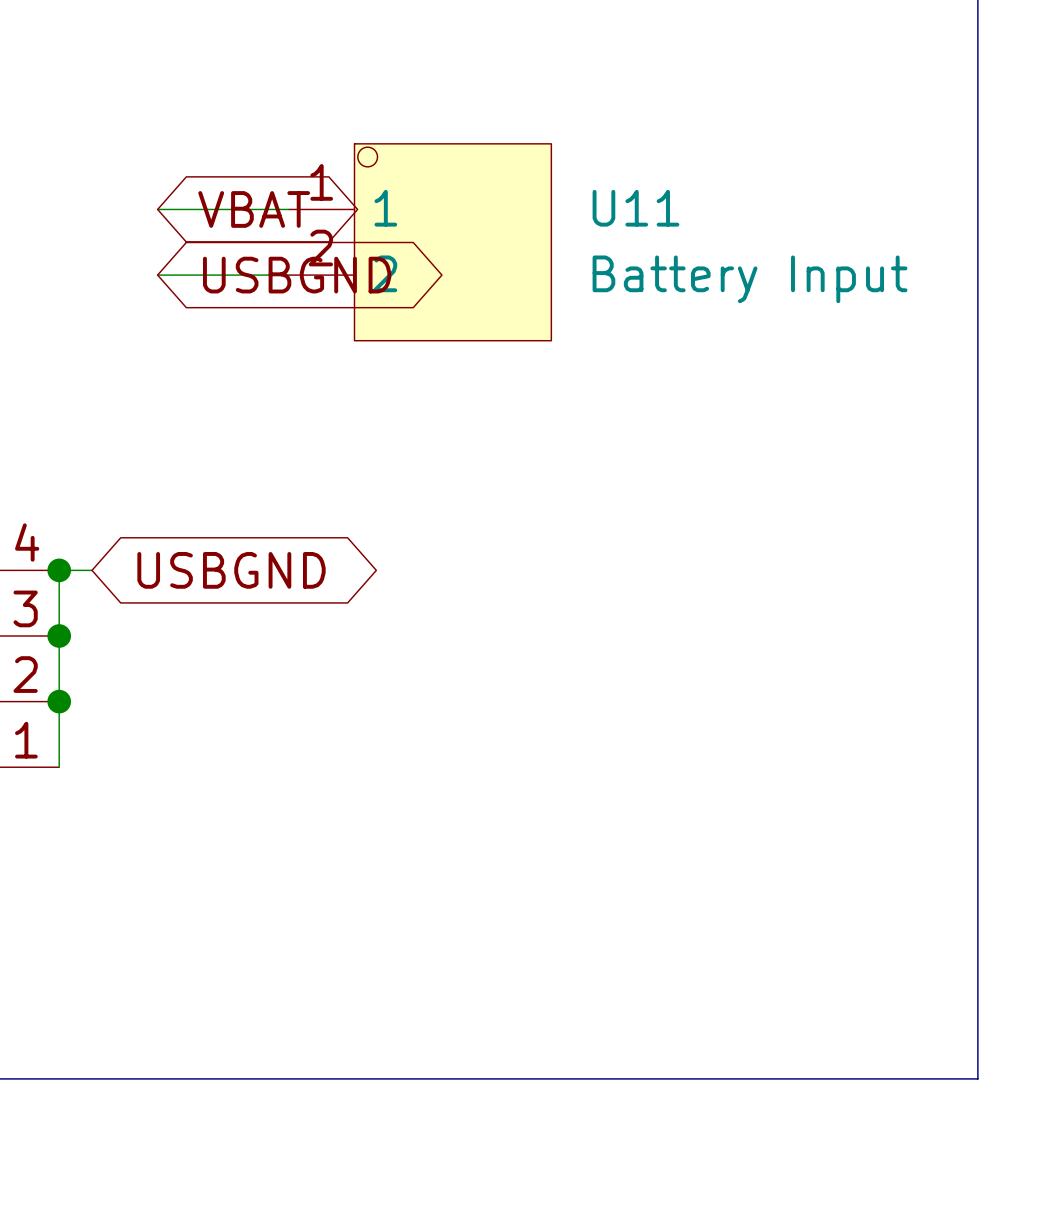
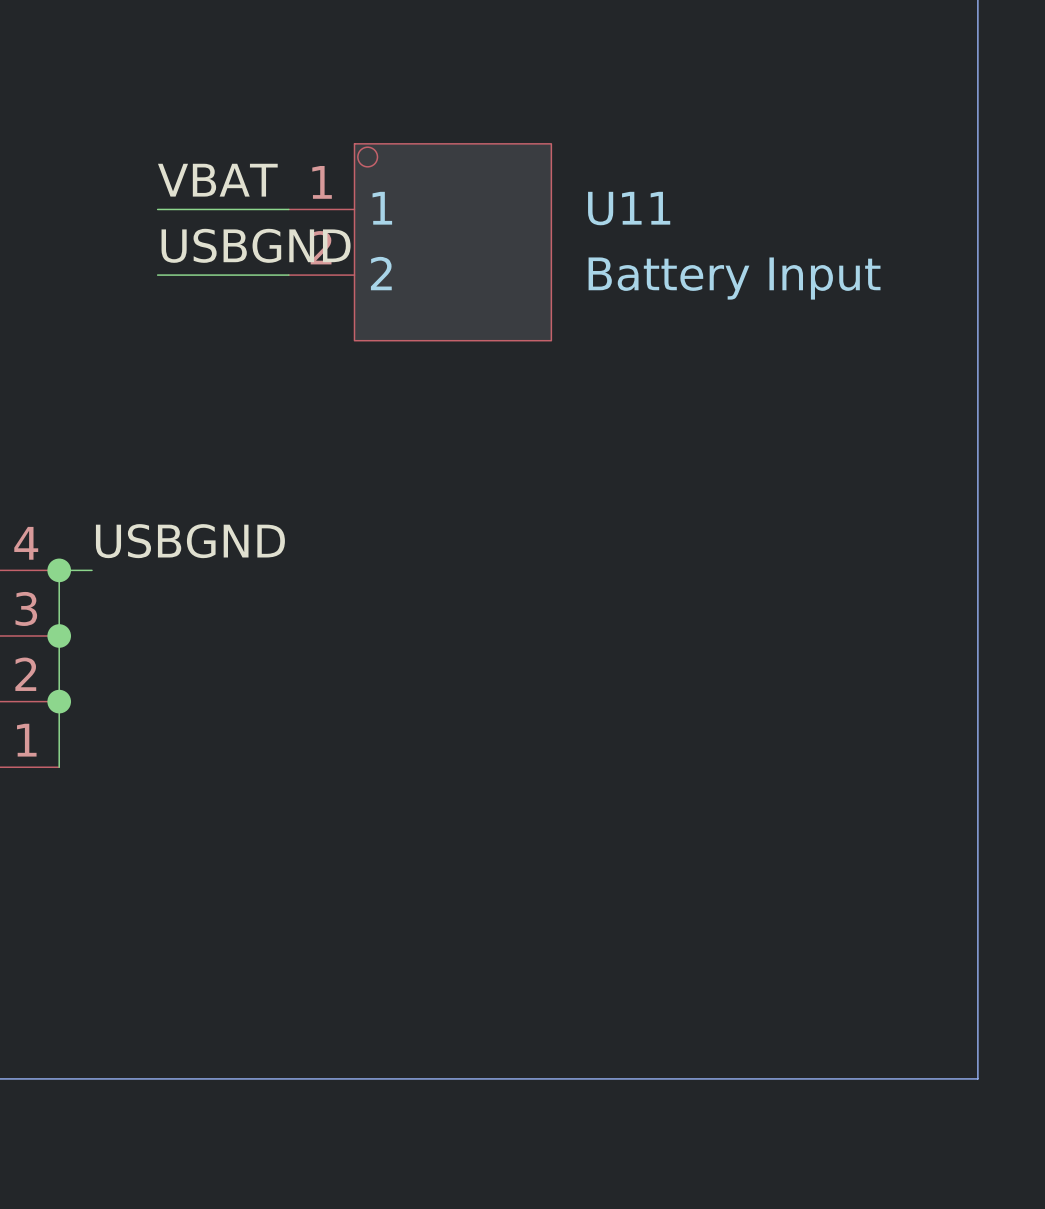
label: none -> VBAT (217, 180)
global label: VBAT (254, 209) -> none
label: none -> USBGND (256, 245)
global label: USBGND (297, 275) -> none
label: none -> USBGND (190, 541)
global label: USBGND (231, 570) -> none

